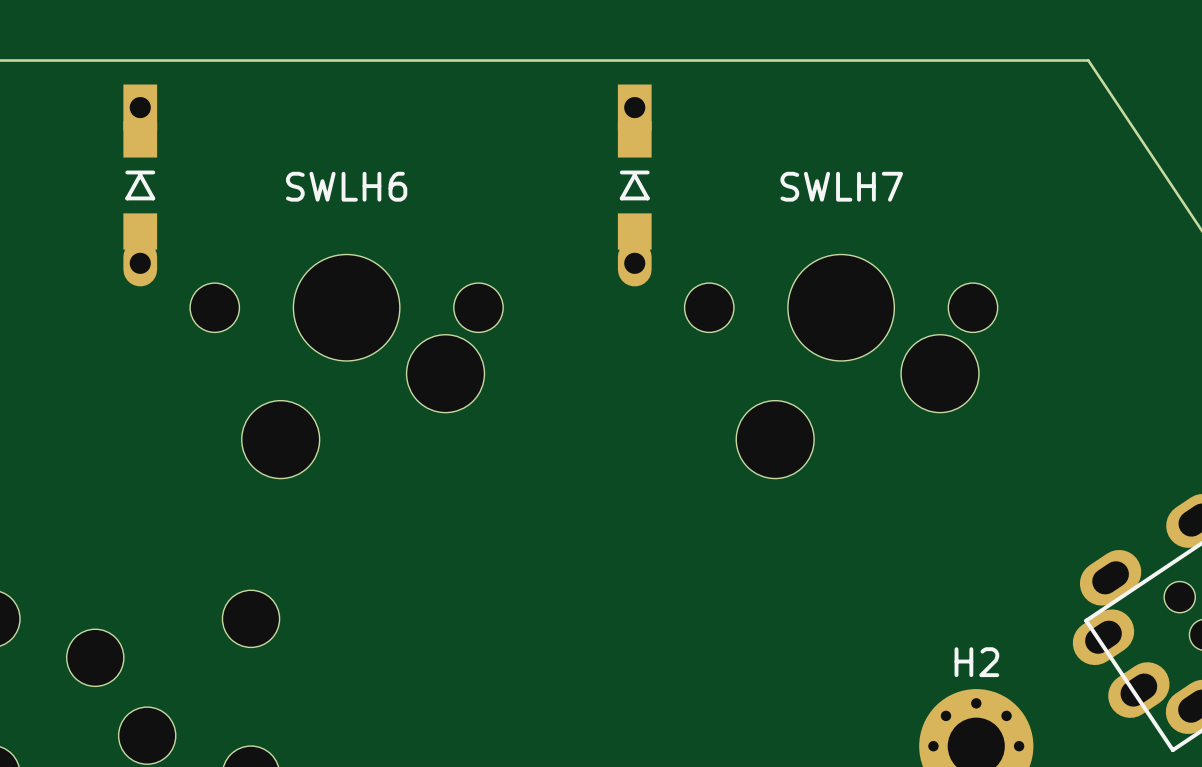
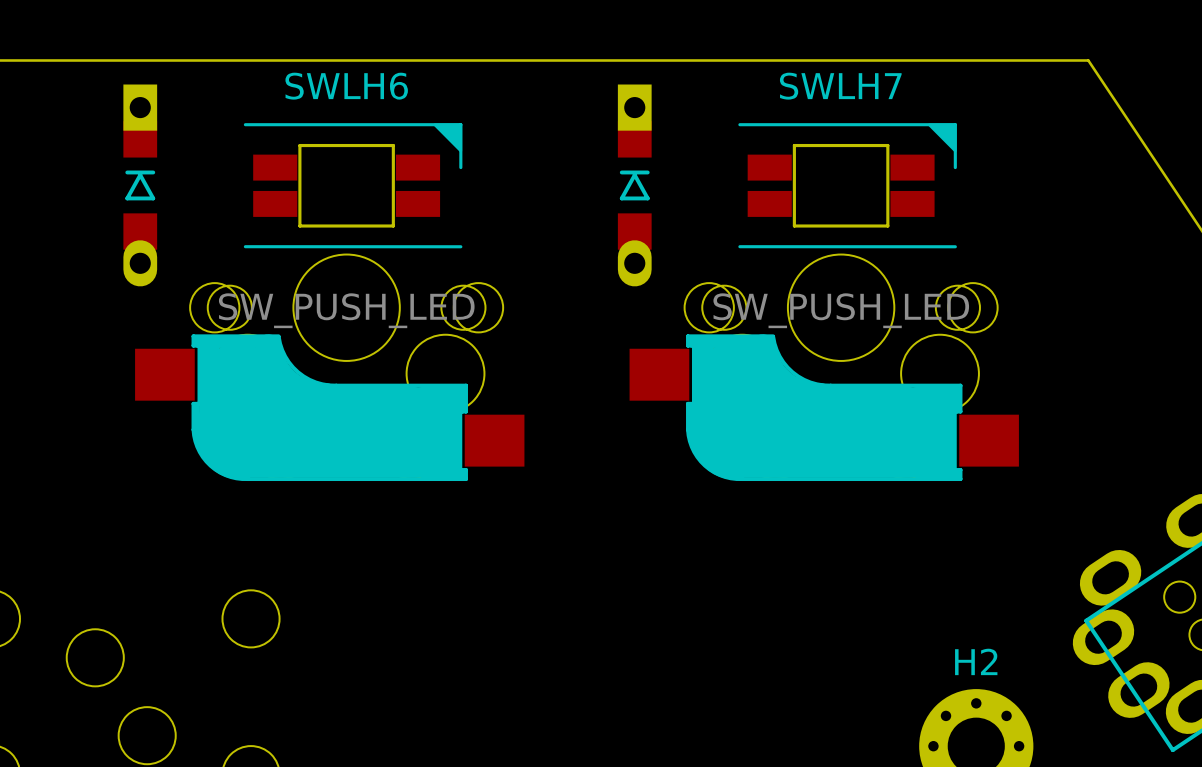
SWLH6 footprint: [190, 254, 504, 479] -> [135, 123, 525, 482]
SWLH7 footprint: [684, 254, 998, 479] -> [629, 123, 1019, 482]
SWLH6 value: none -> SW_PUSH_LED (346, 310)
SWLH7 value: none -> SW_PUSH_LED (841, 310)

